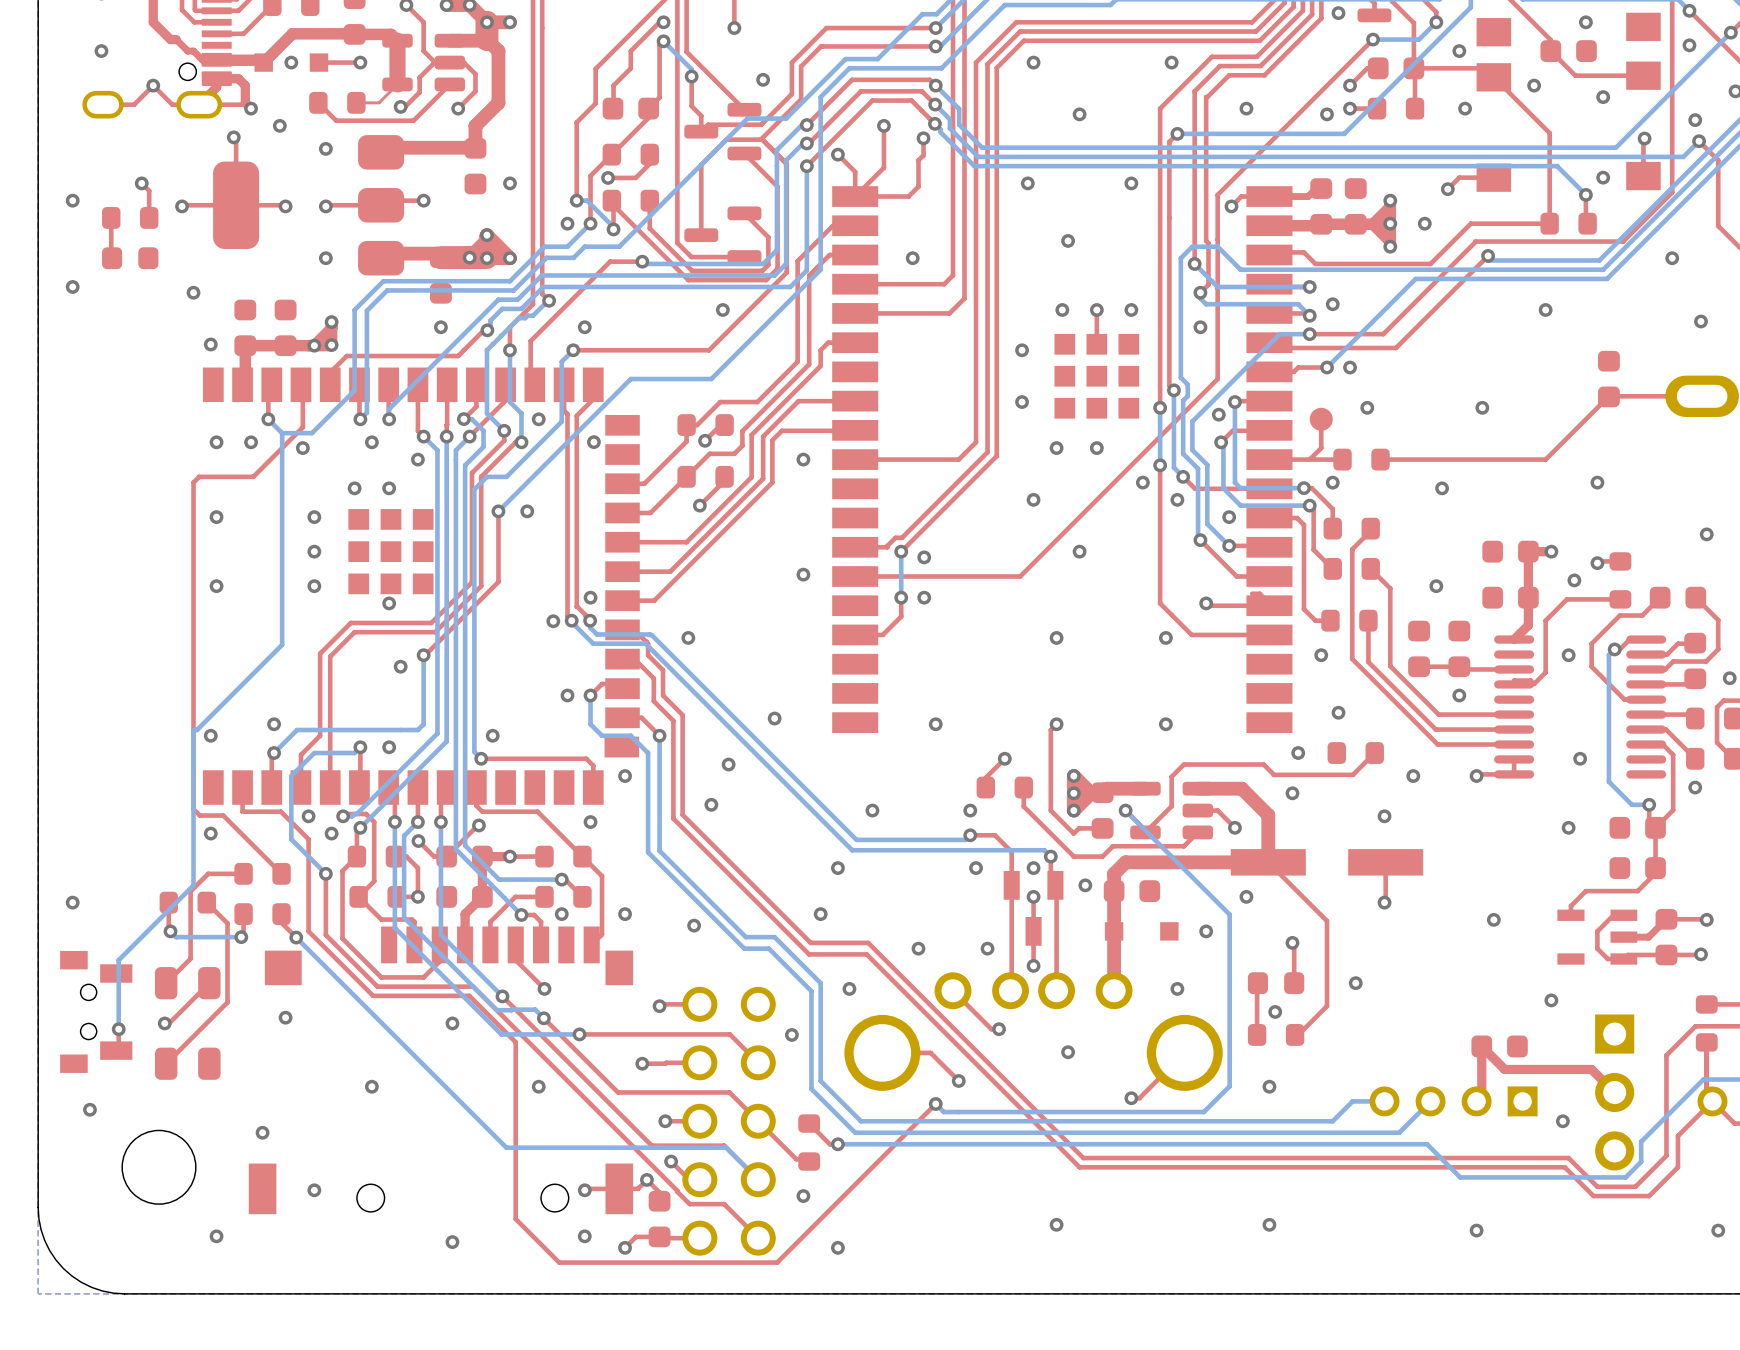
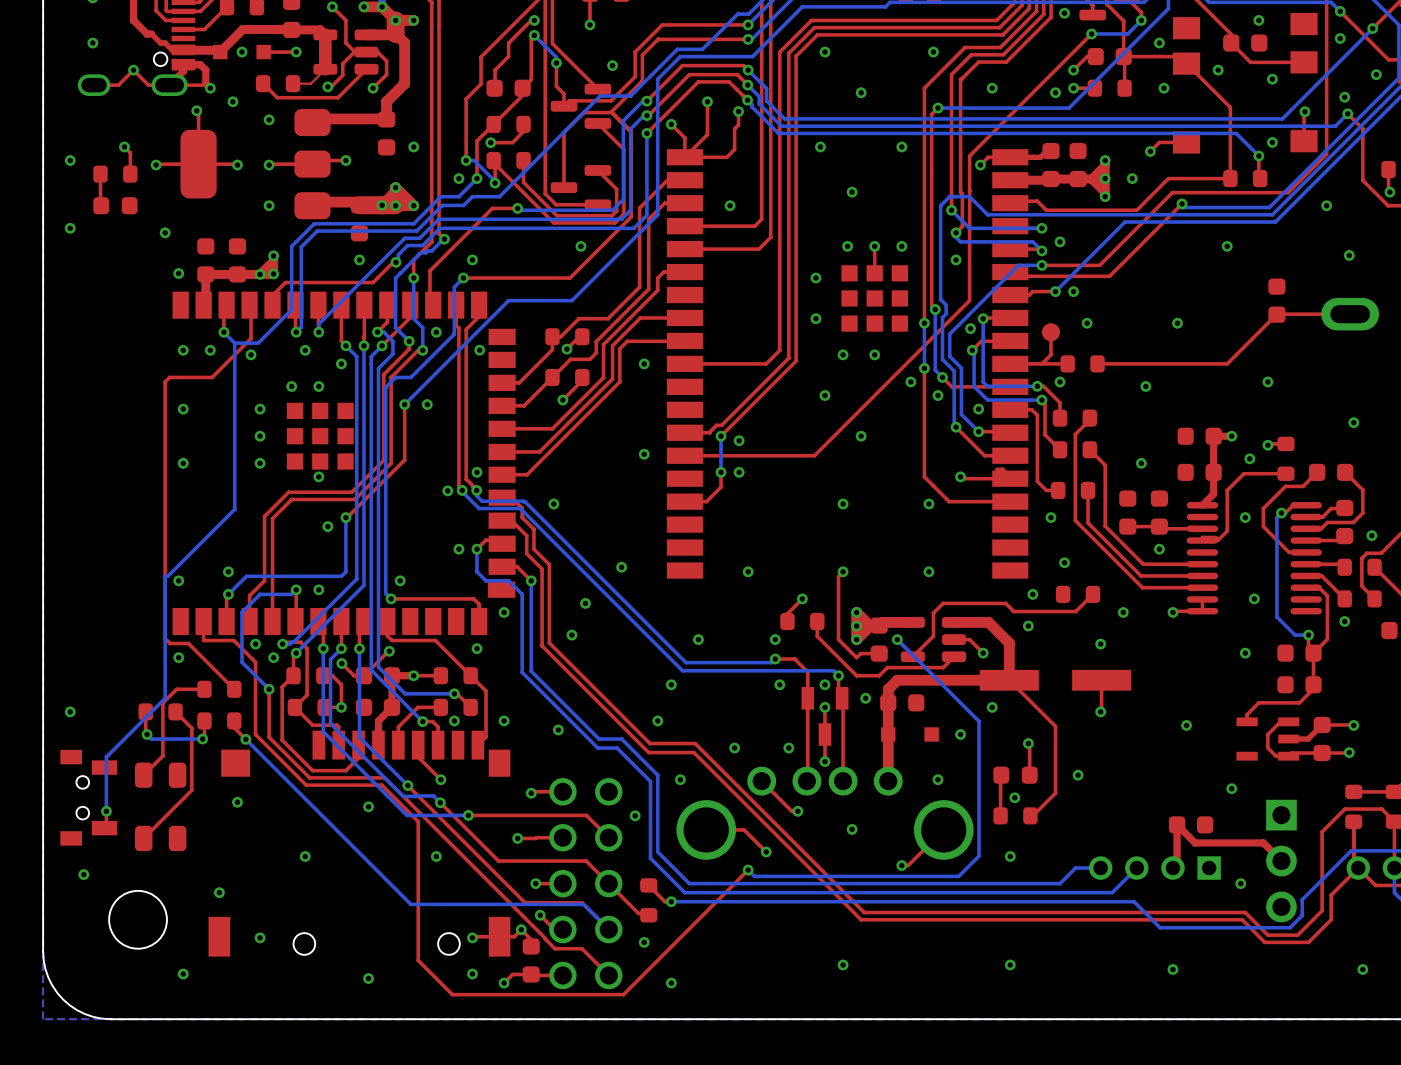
top track: (209, 983) (169, 1023) (164, 1023) -> none
via: (164, 1023) -> none

